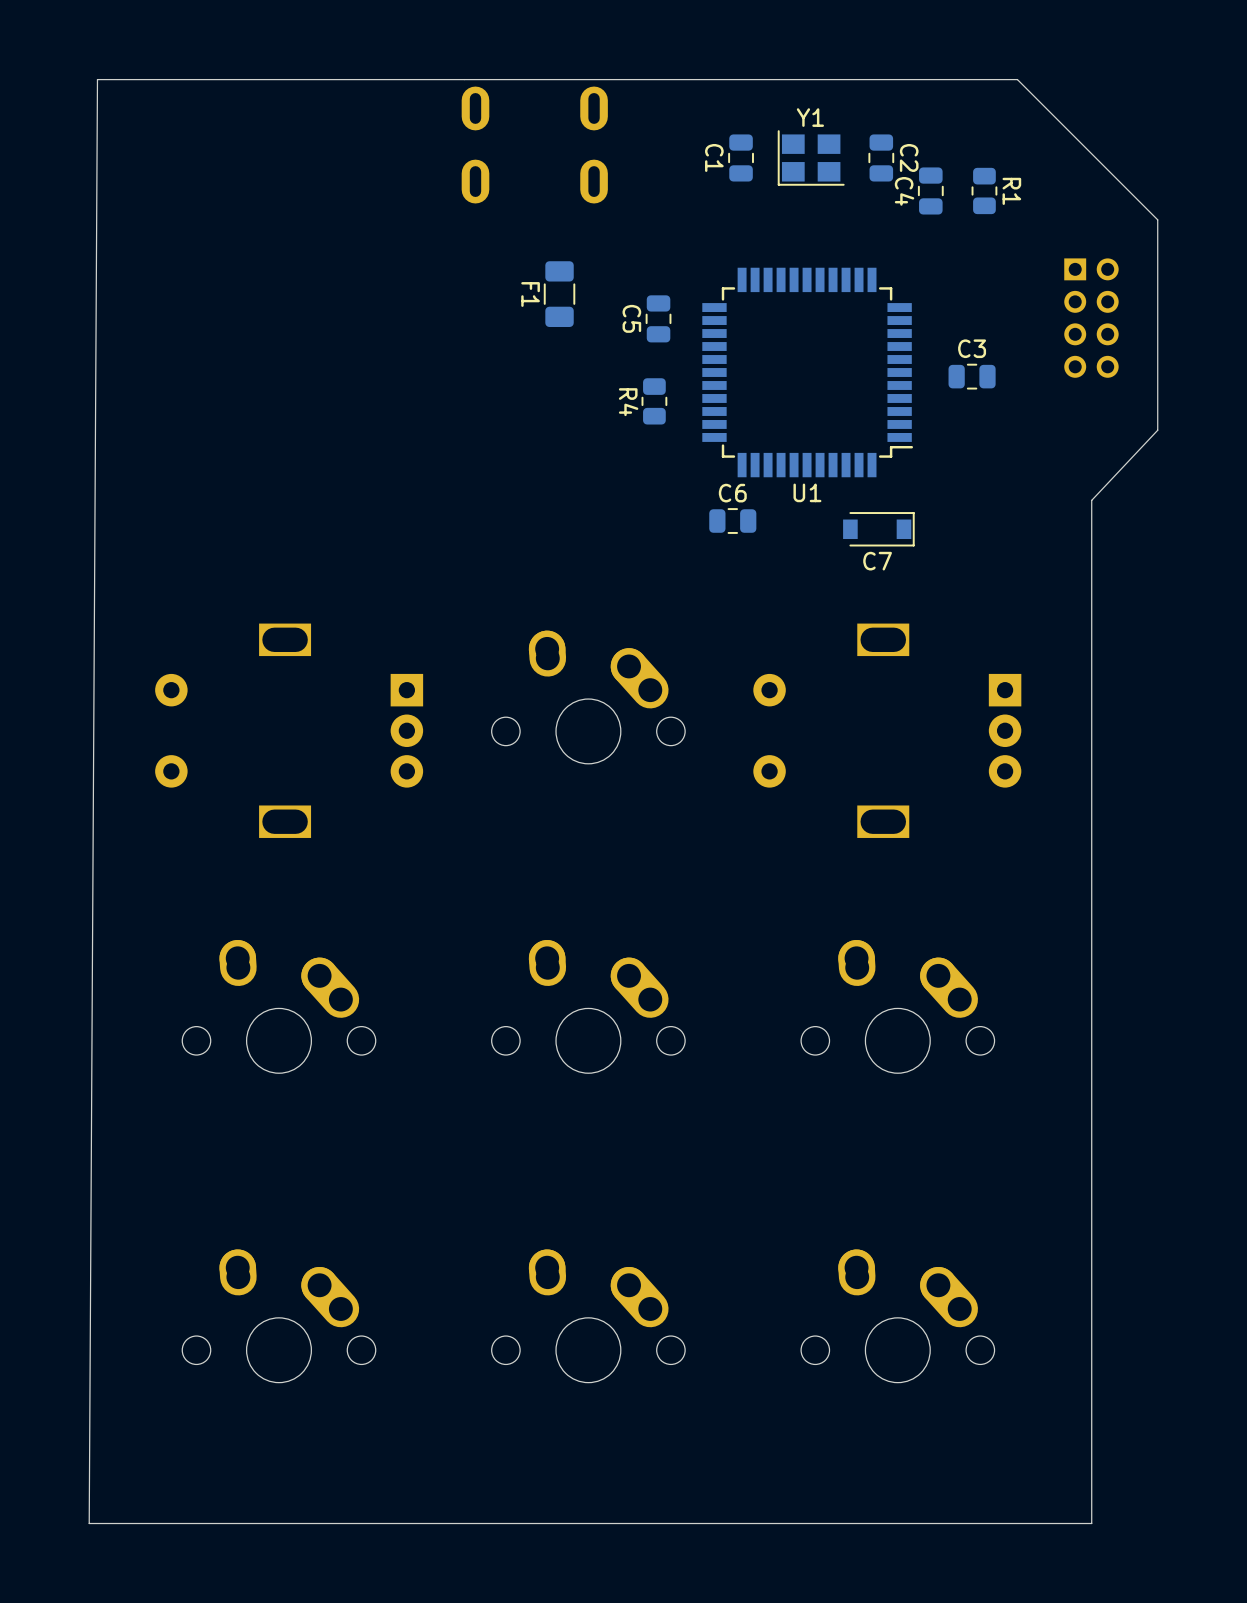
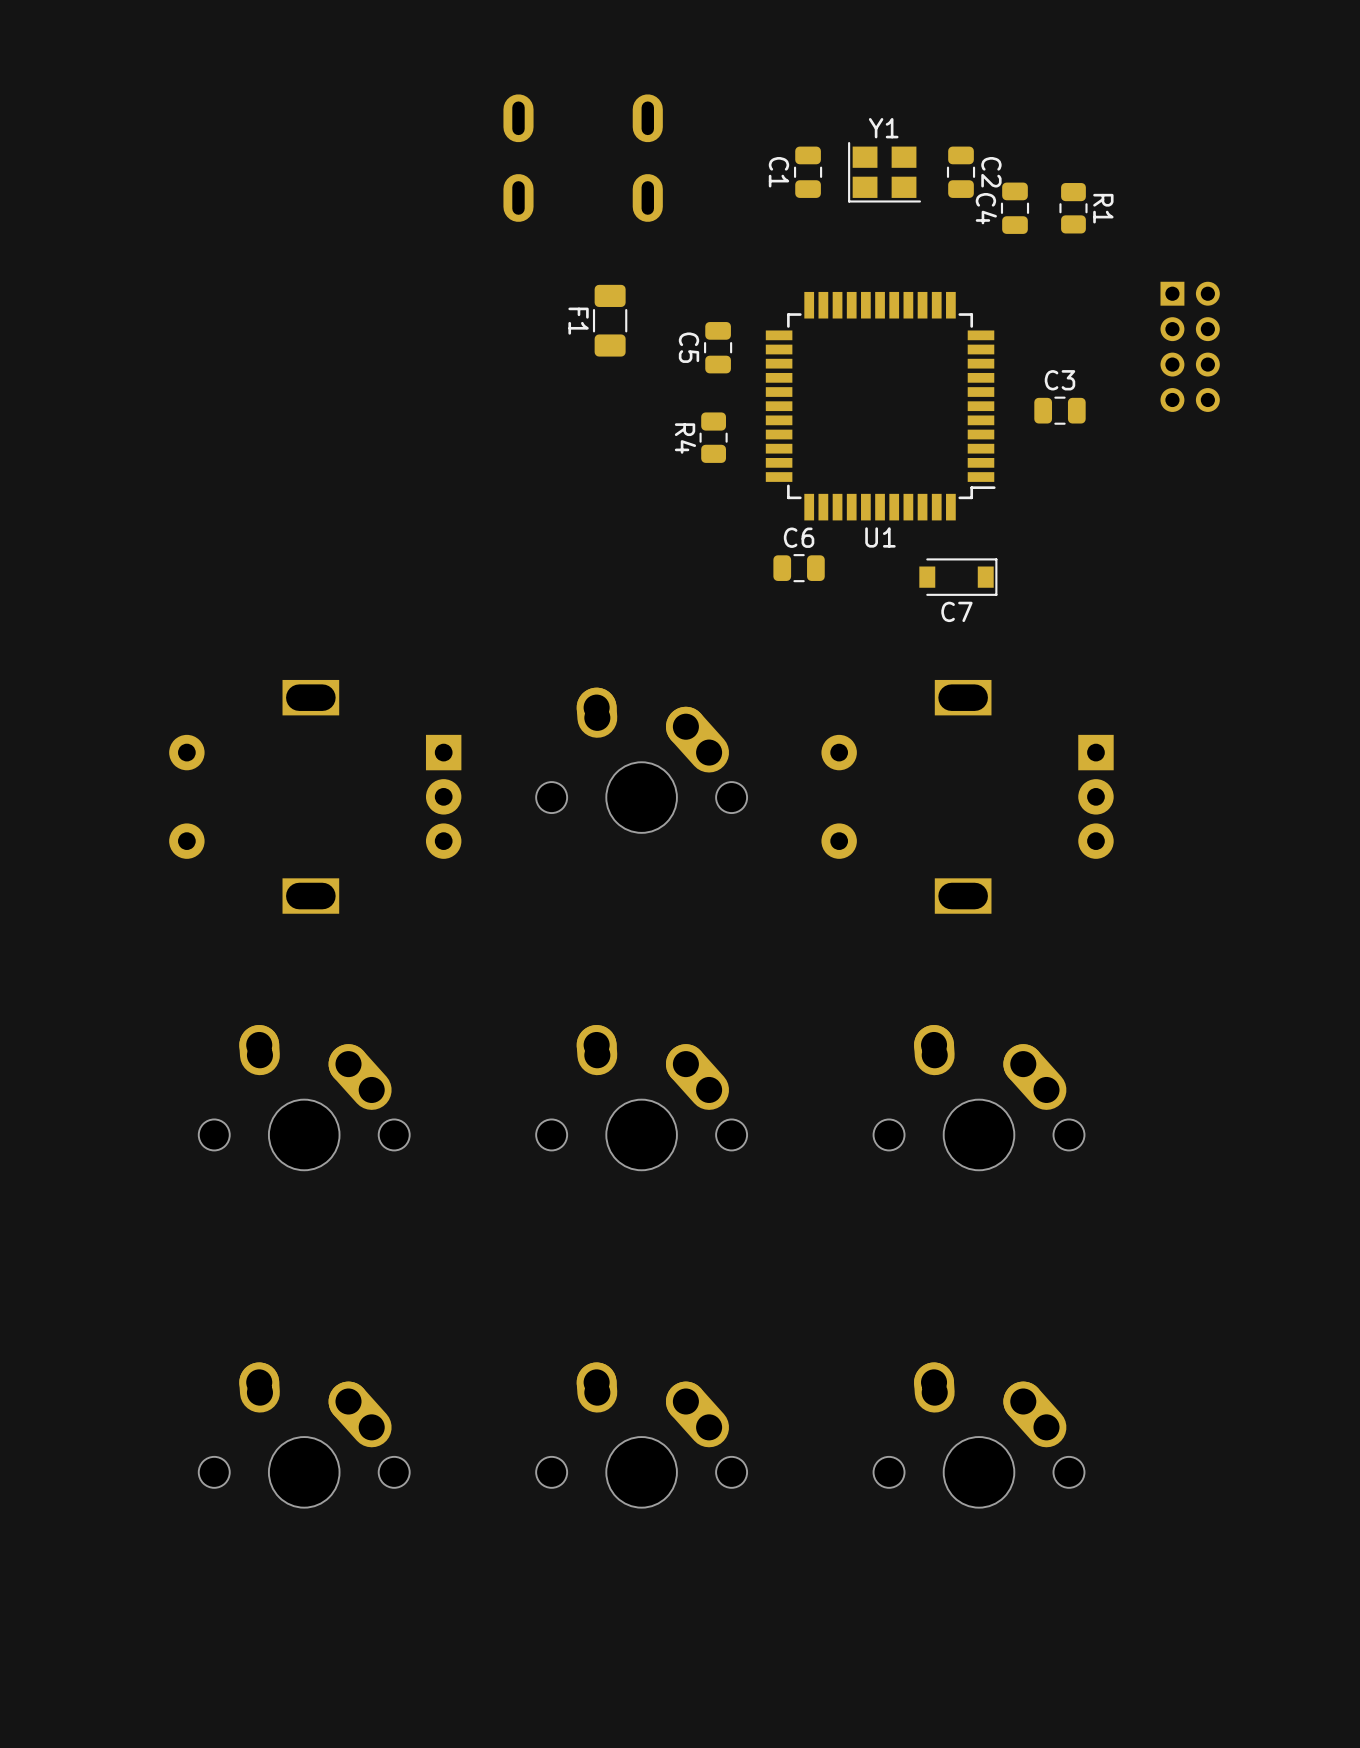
board edge: (1017, 79) (1157, 219) (1157, 430) (1091, 500) (1091, 1523) (89, 1523) (97, 79) (1017, 79) -> none

